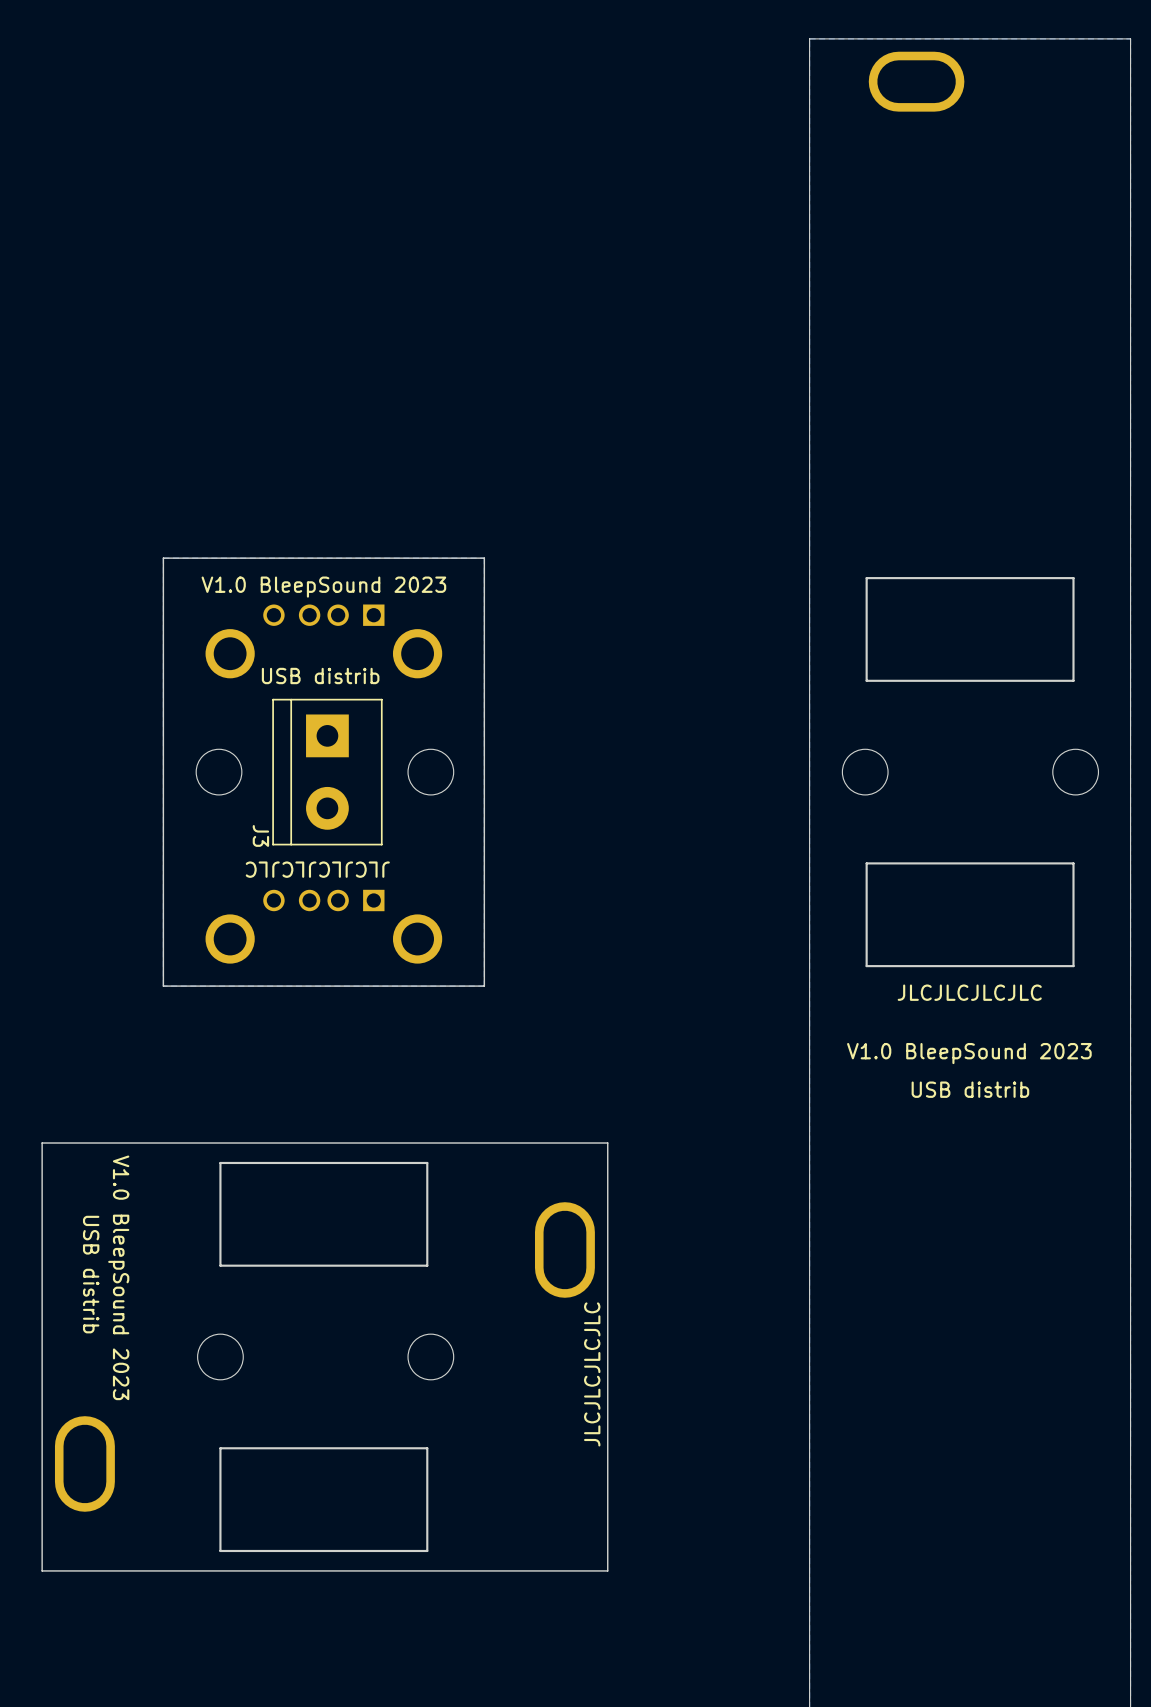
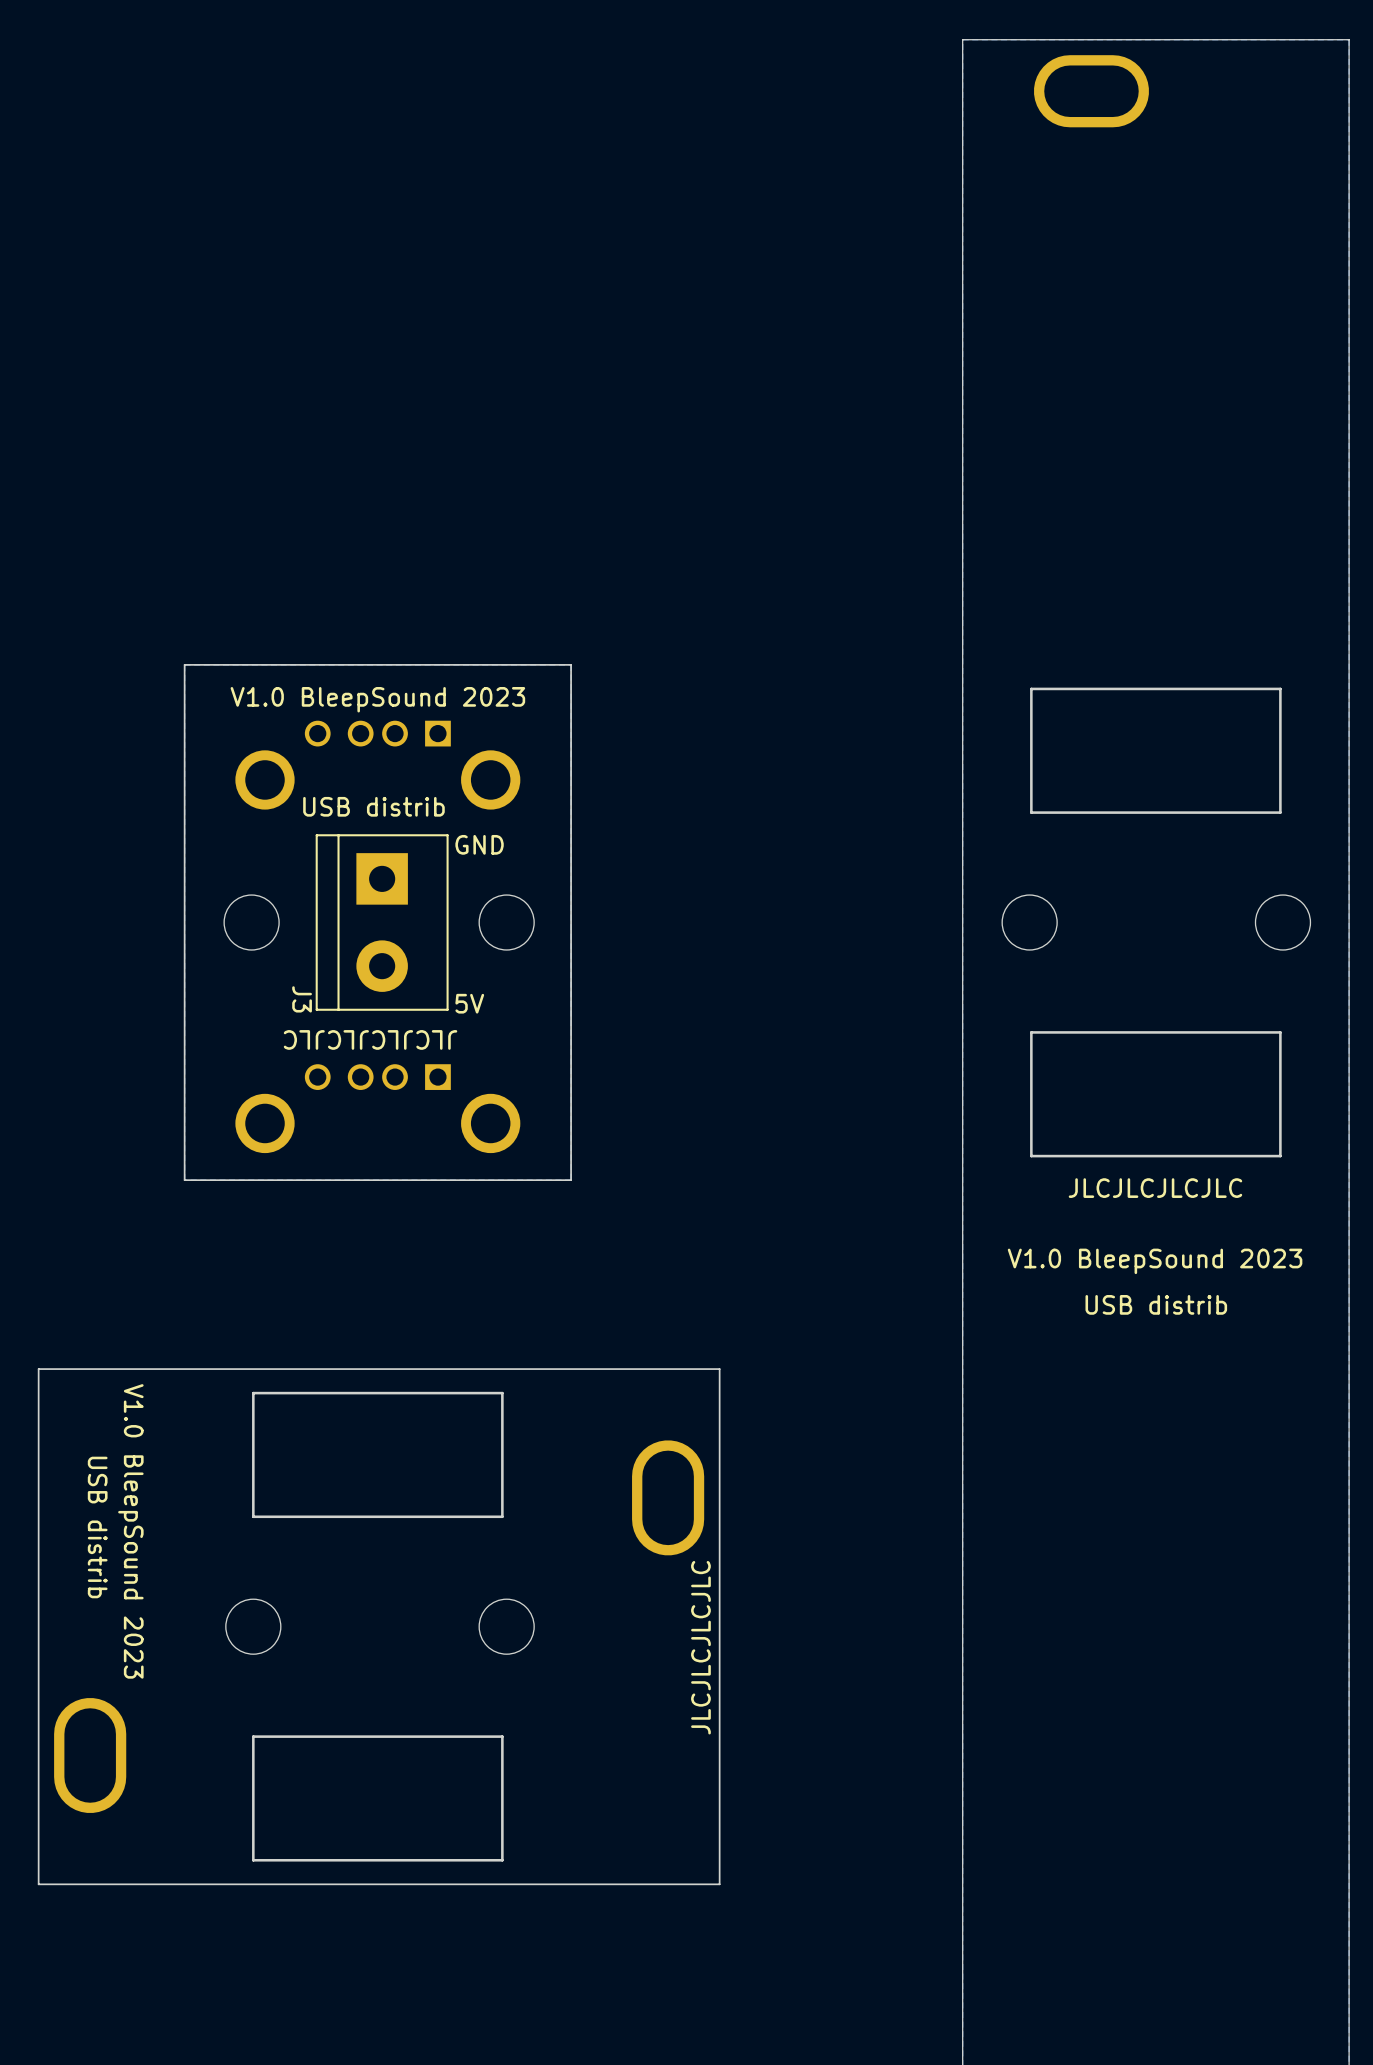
text: none -> GND (479, 844)
text: none -> 5V (469, 1003)

